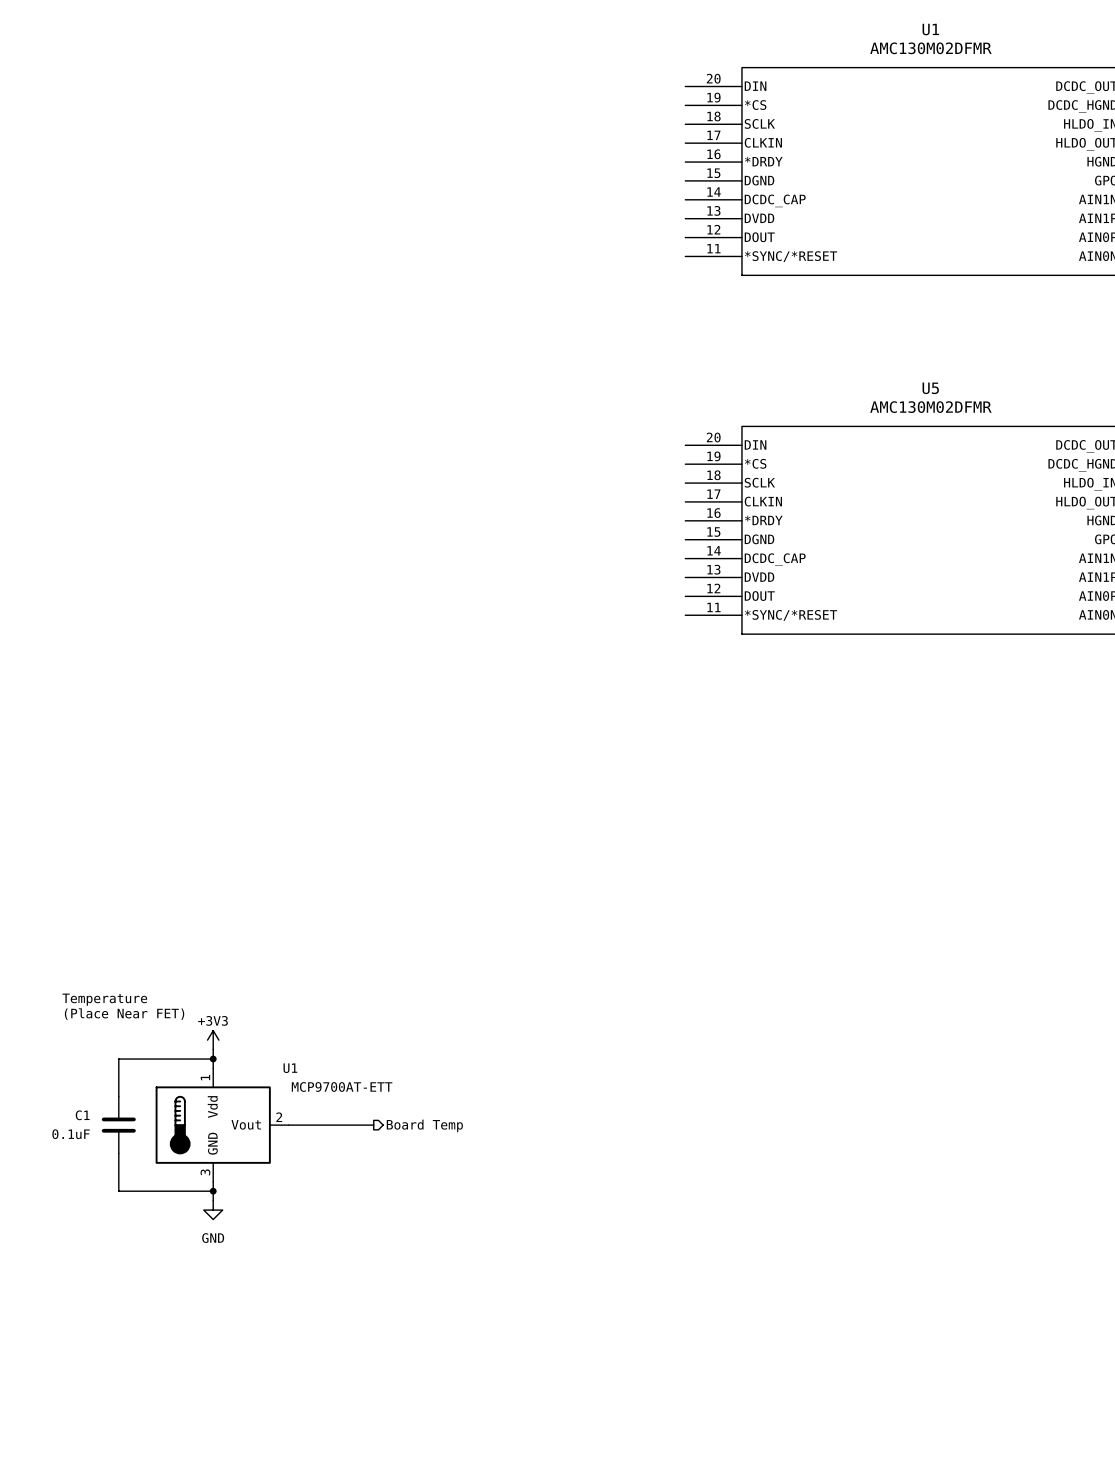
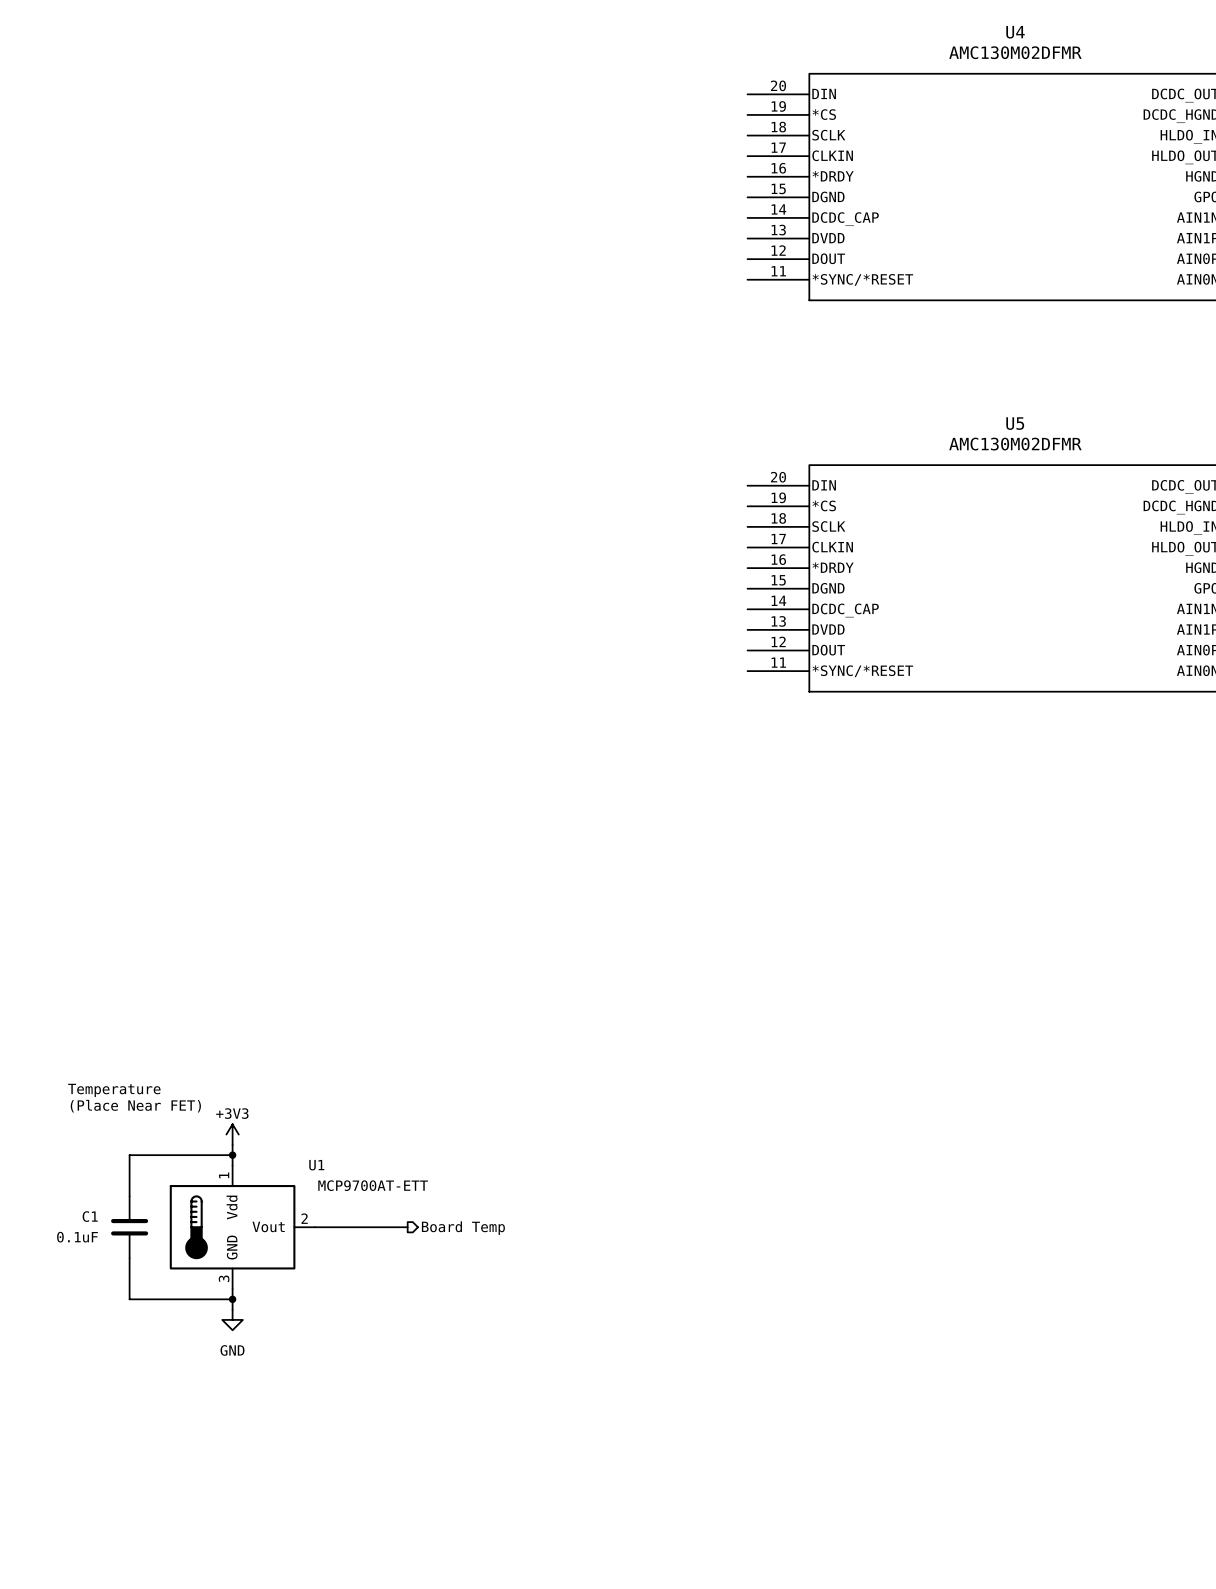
U1 name: U1 (930, 29) -> U4 (1015, 32)

